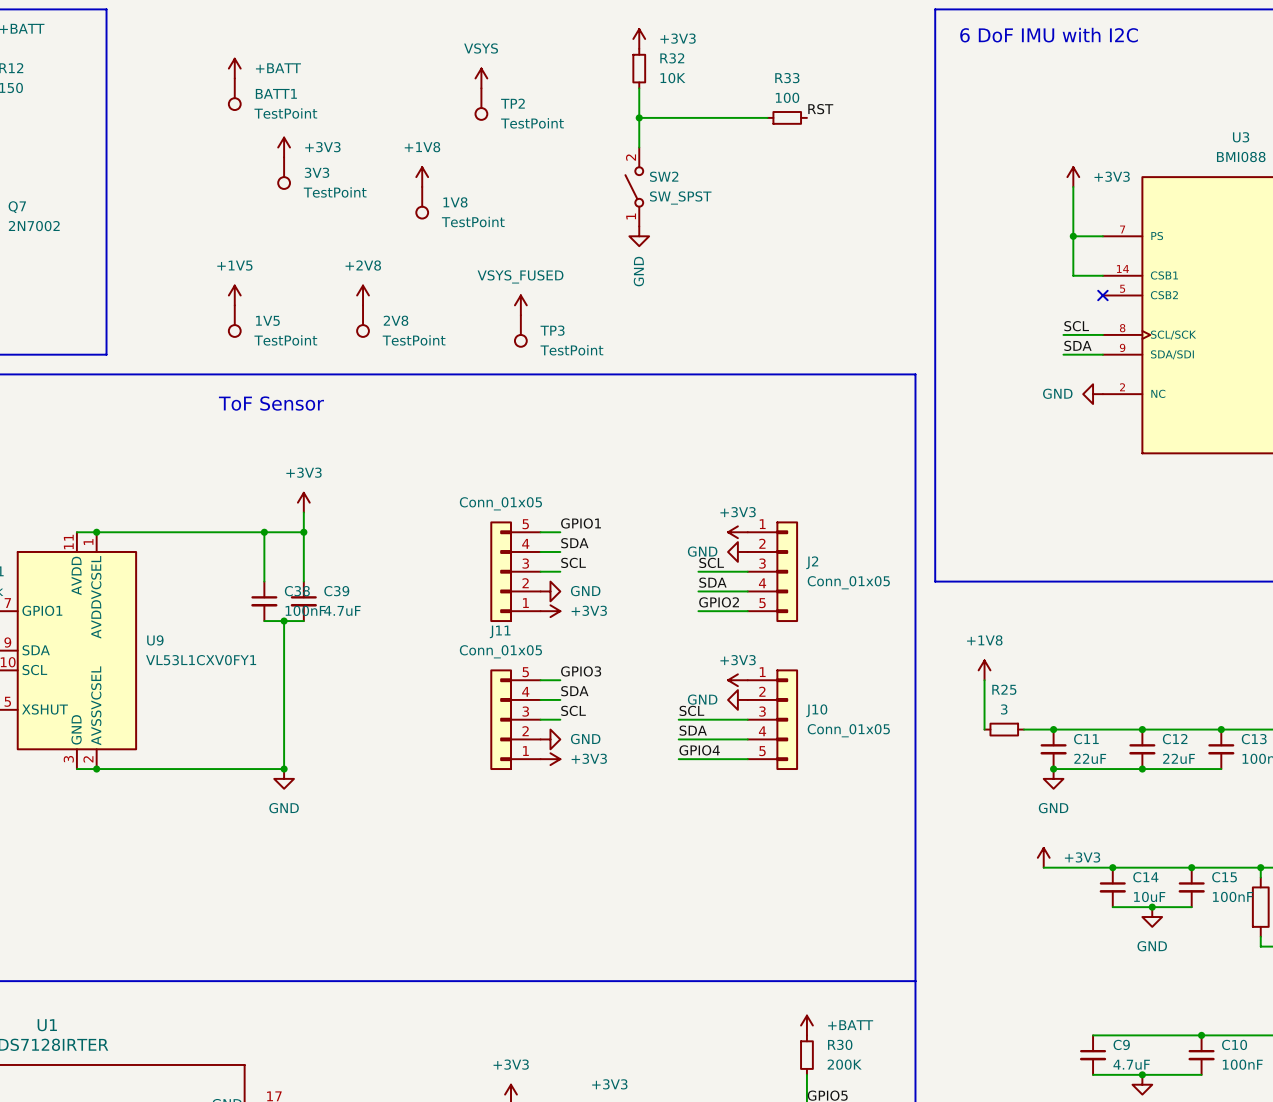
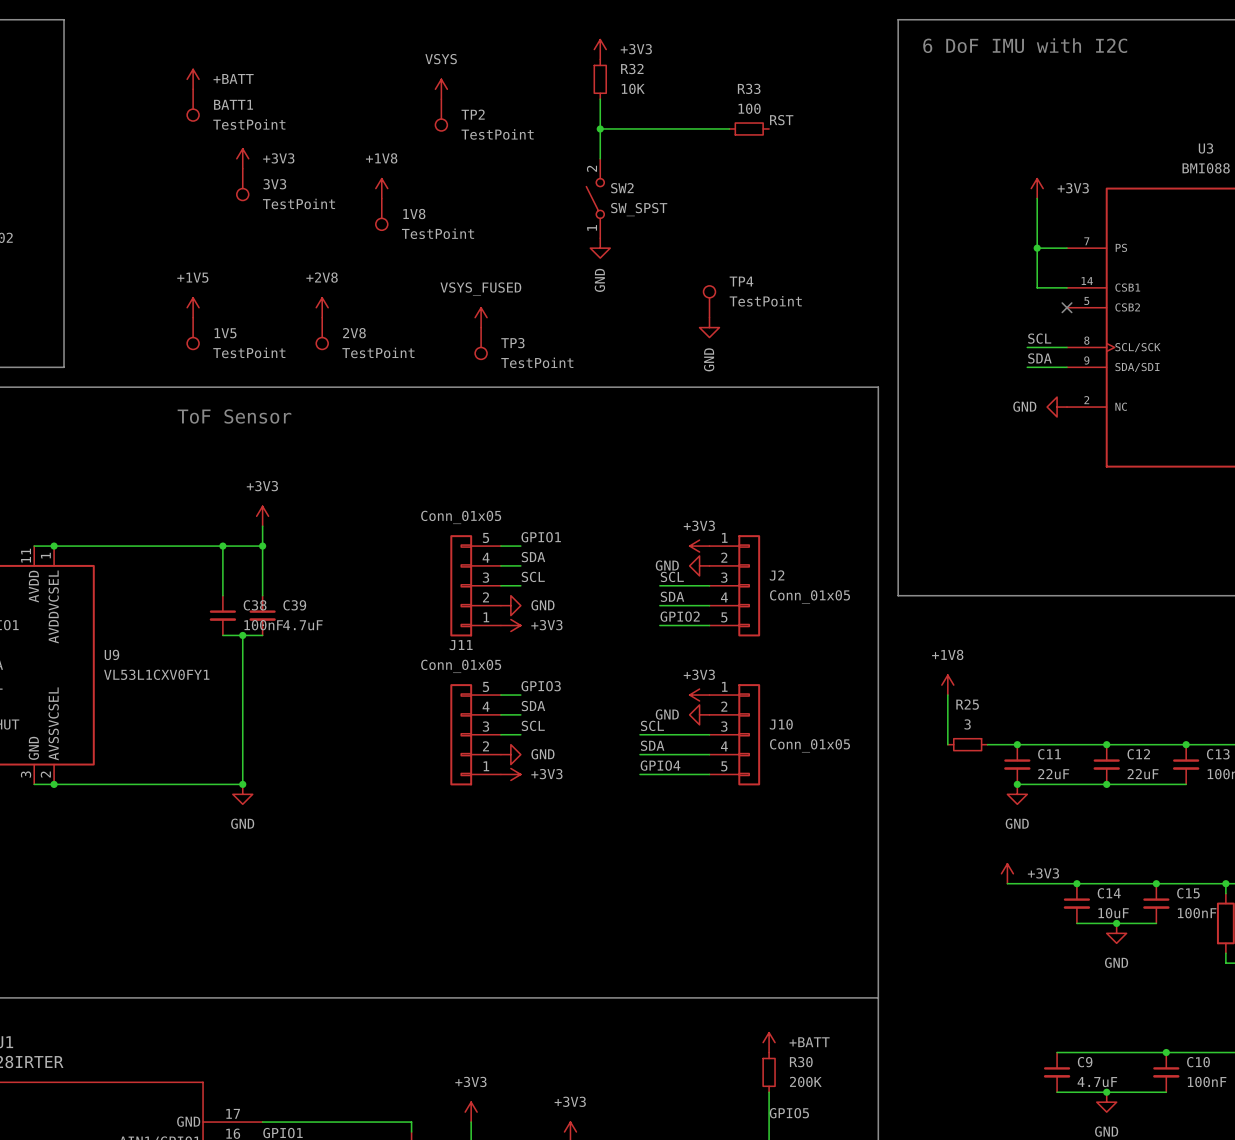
TP4: none -> TestPoint (709, 301)
power symbol: none -> GND (709, 327)

